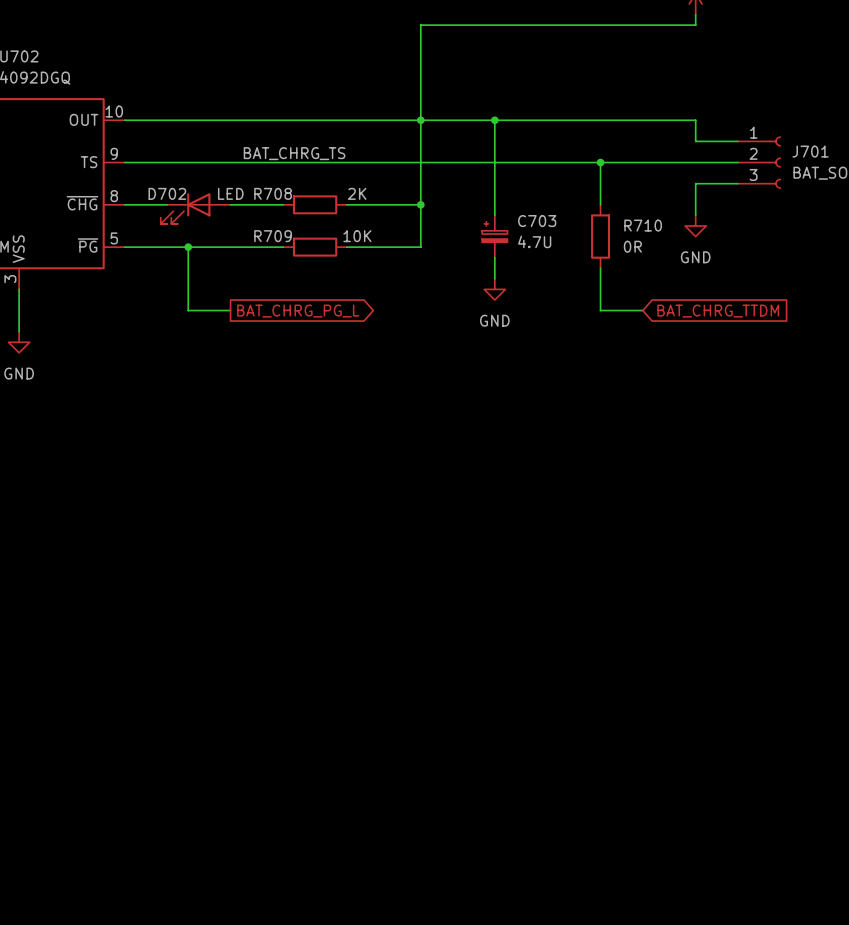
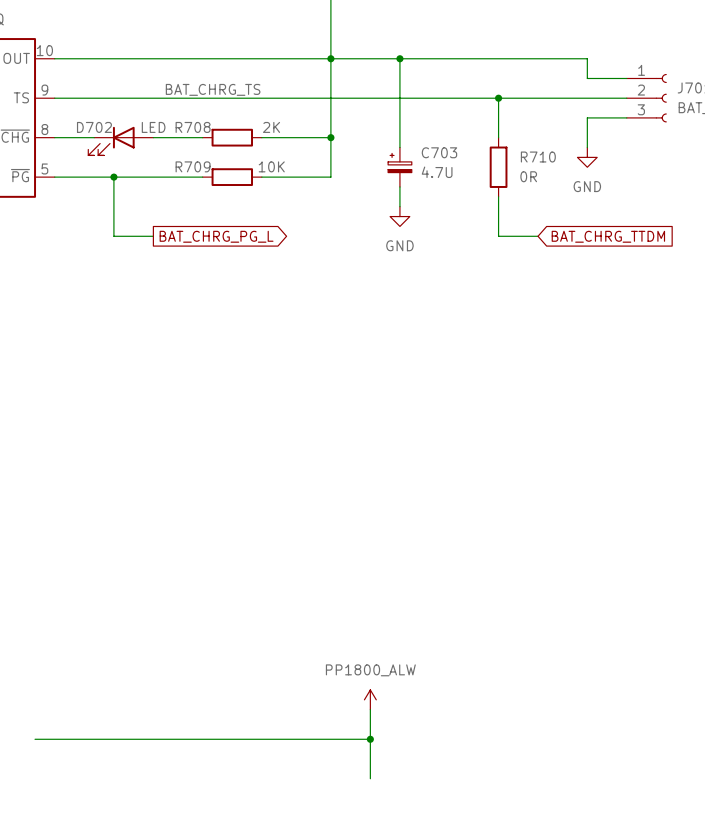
power symbol: none -> PP1800_ALW (370, 699)
wire: none -> (370, 709) (370, 778)
wire: none -> (35, 739) (370, 739)
junction: none -> (370, 739)

